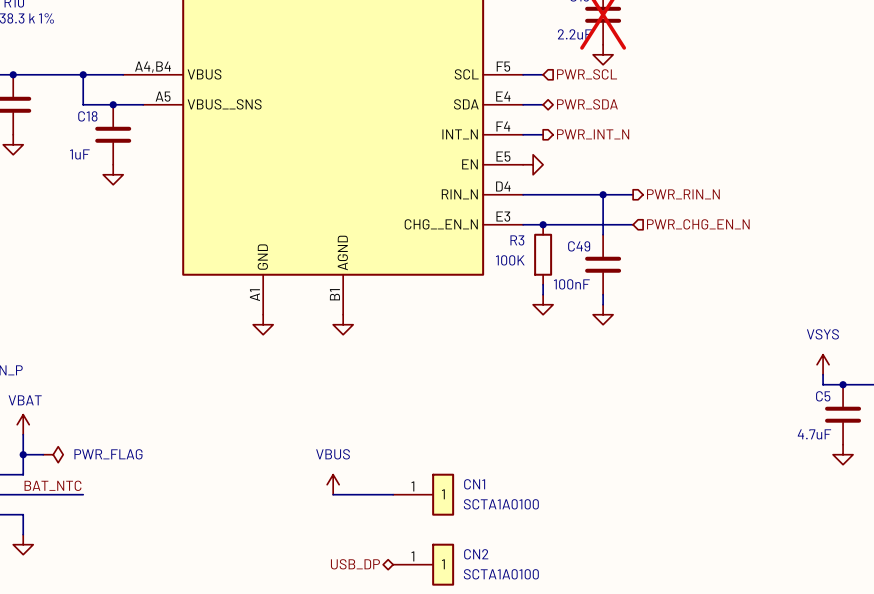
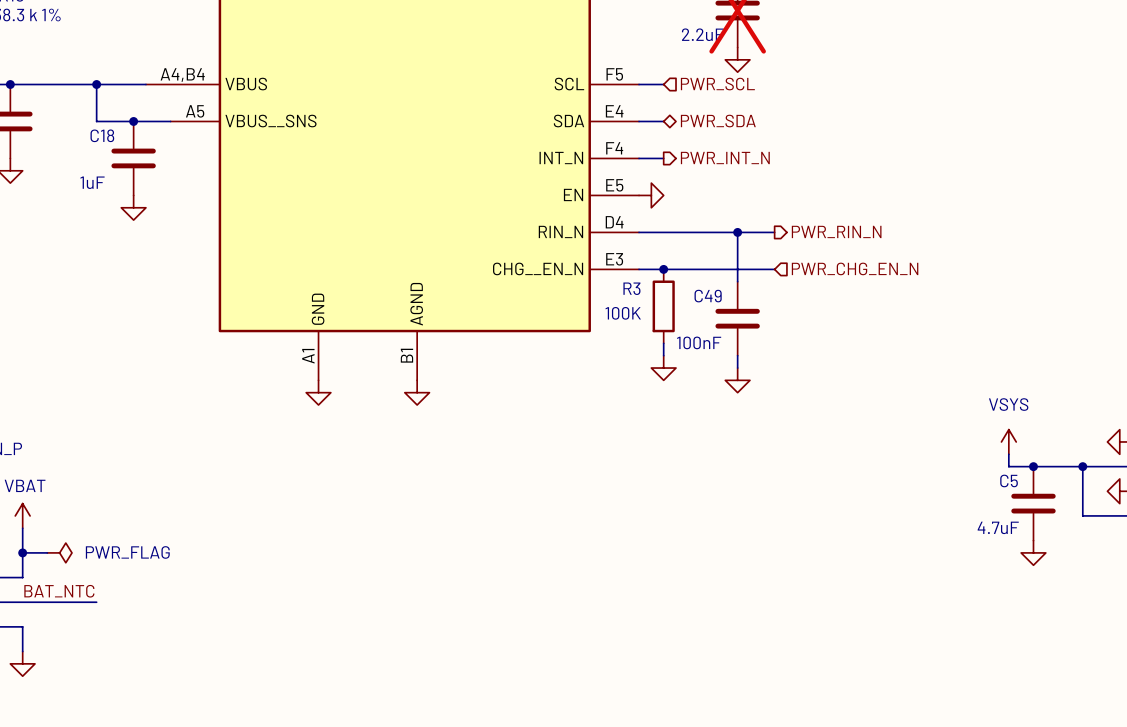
power symbol: VBUS (333, 484) -> none
wire: (333, 494) (393, 494) -> none
CN1: SCTA1A0100 (423, 494) -> none
hierarchical label: USB_DP (355, 564) -> none
CN2: SCTA1A0100 (423, 564) -> none

